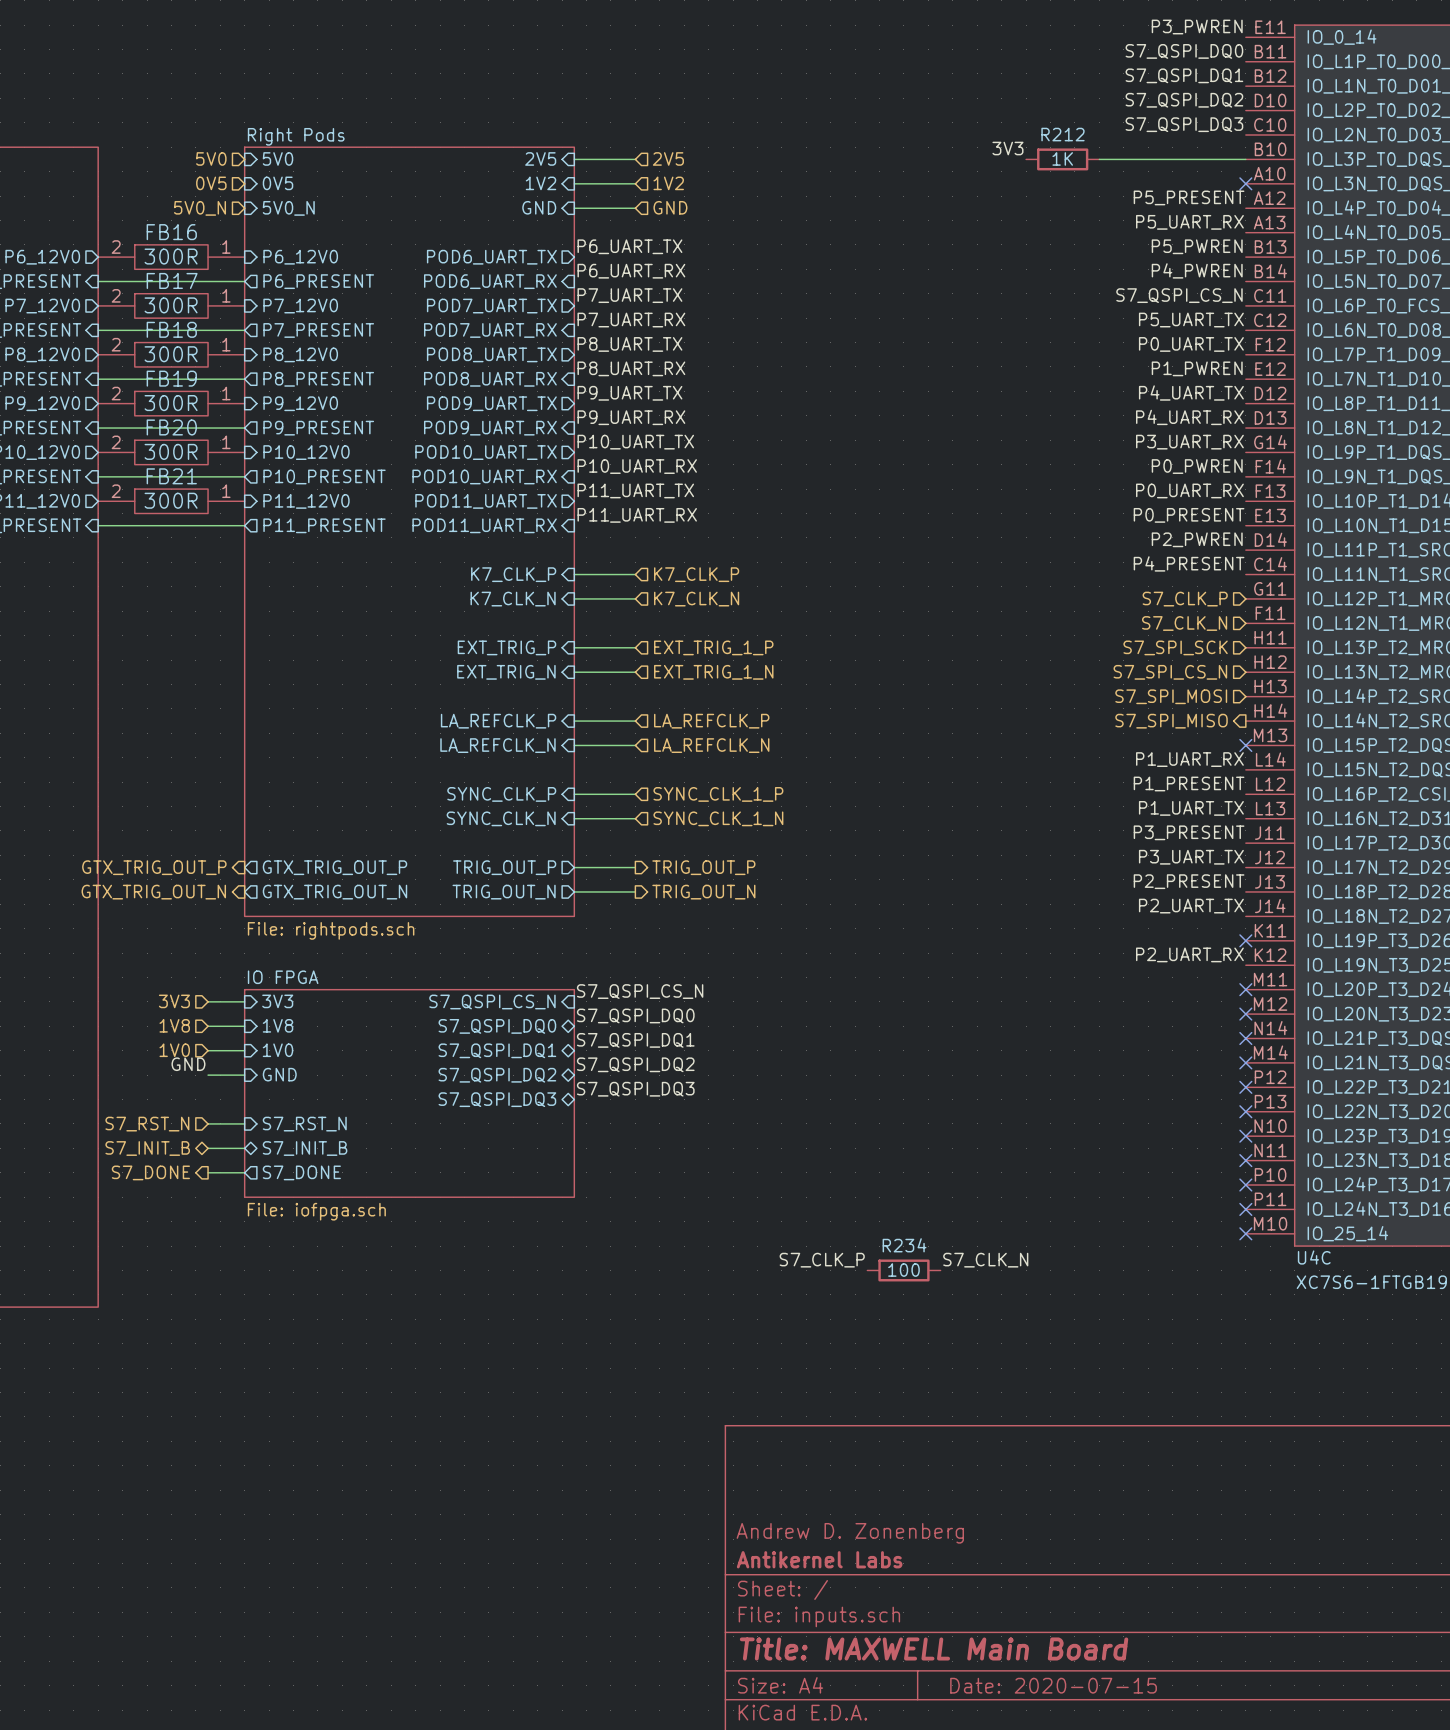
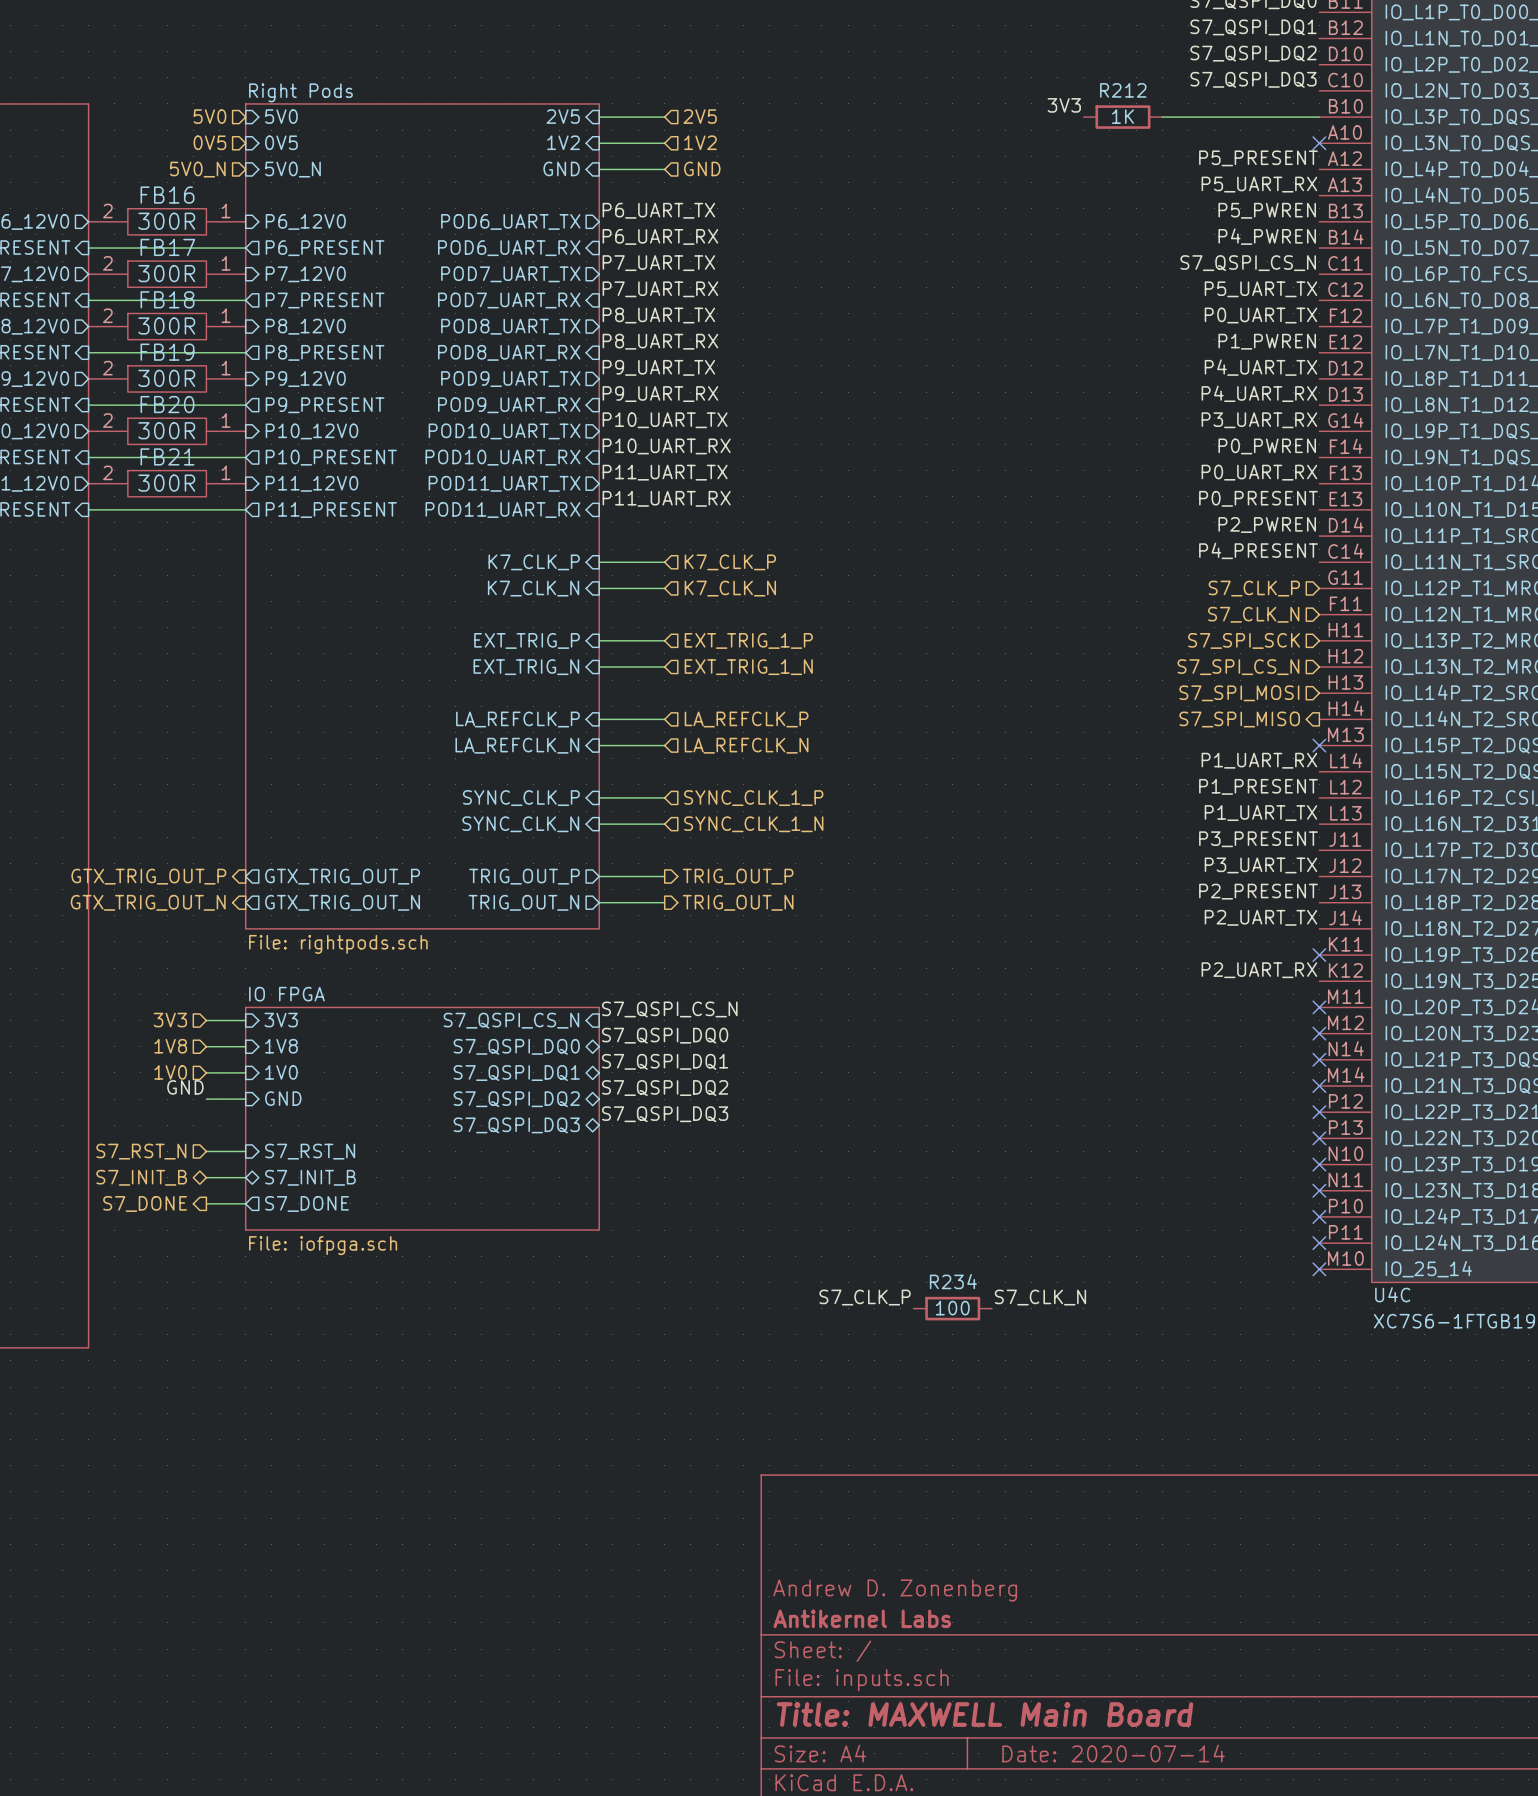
title block: Date: 2020-07-15 (1053, 1685) -> Date: 2020-07-14 (1113, 1753)

